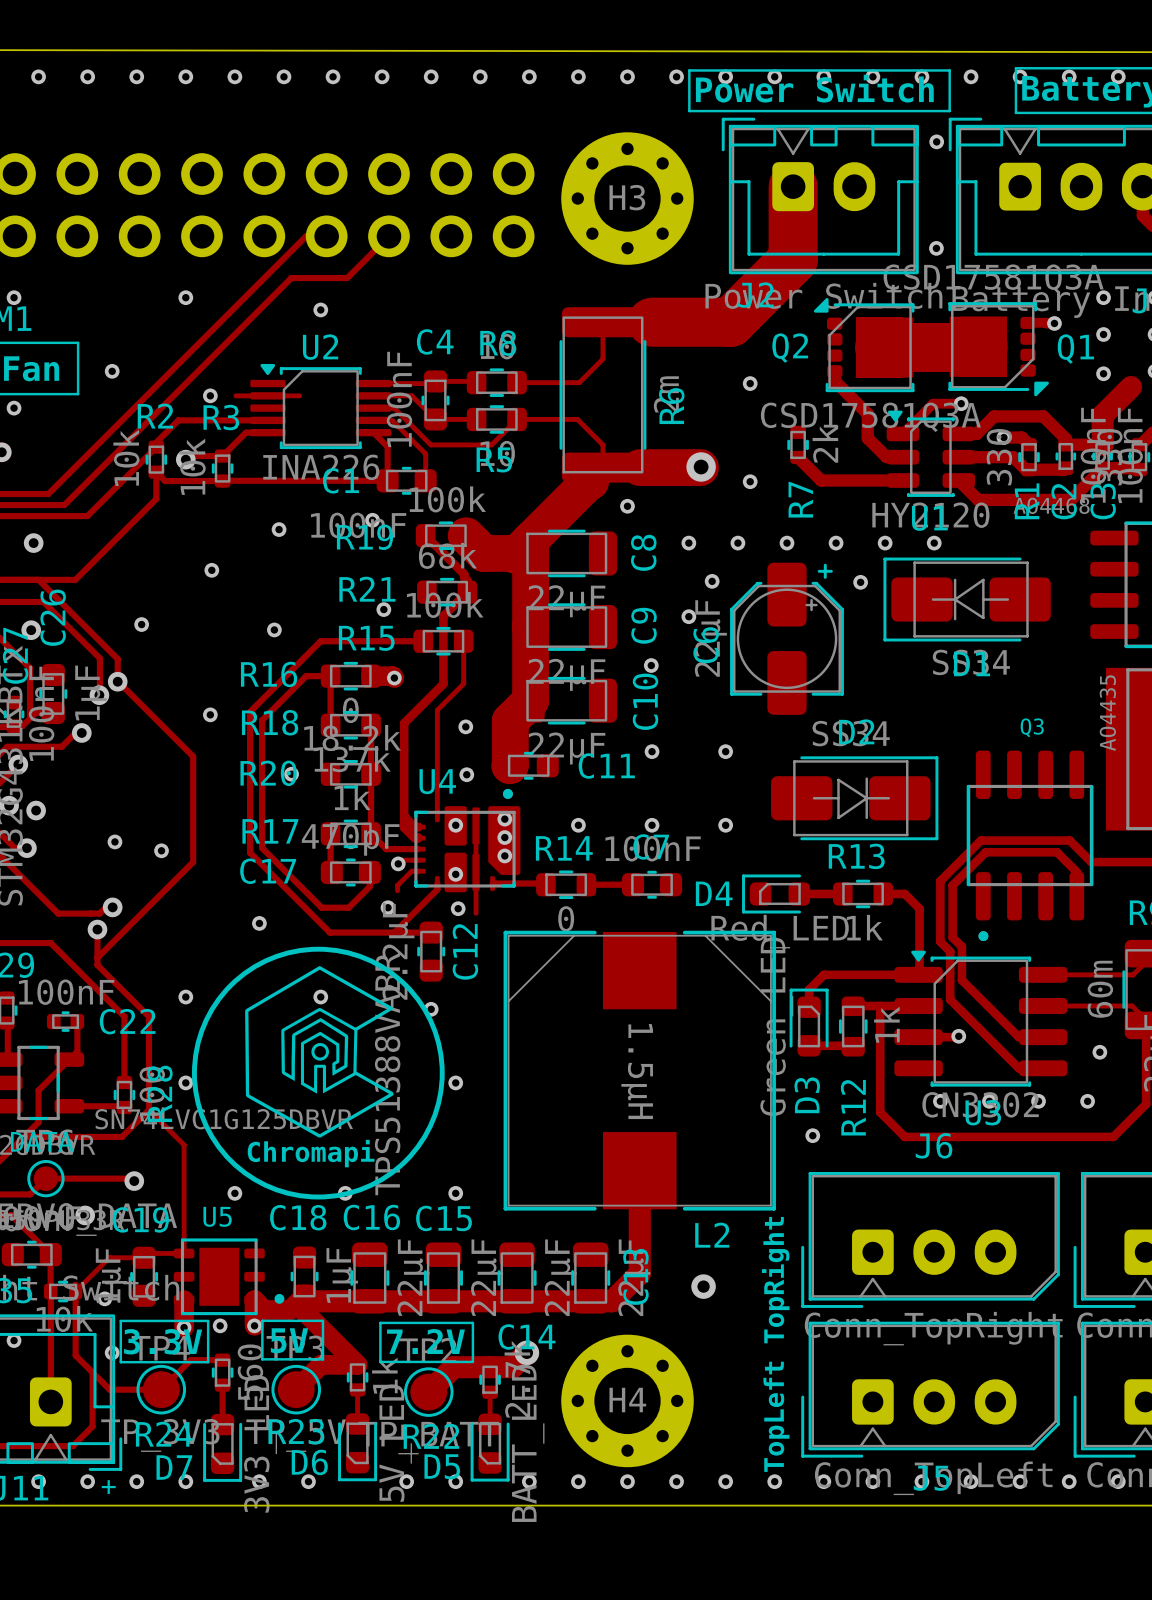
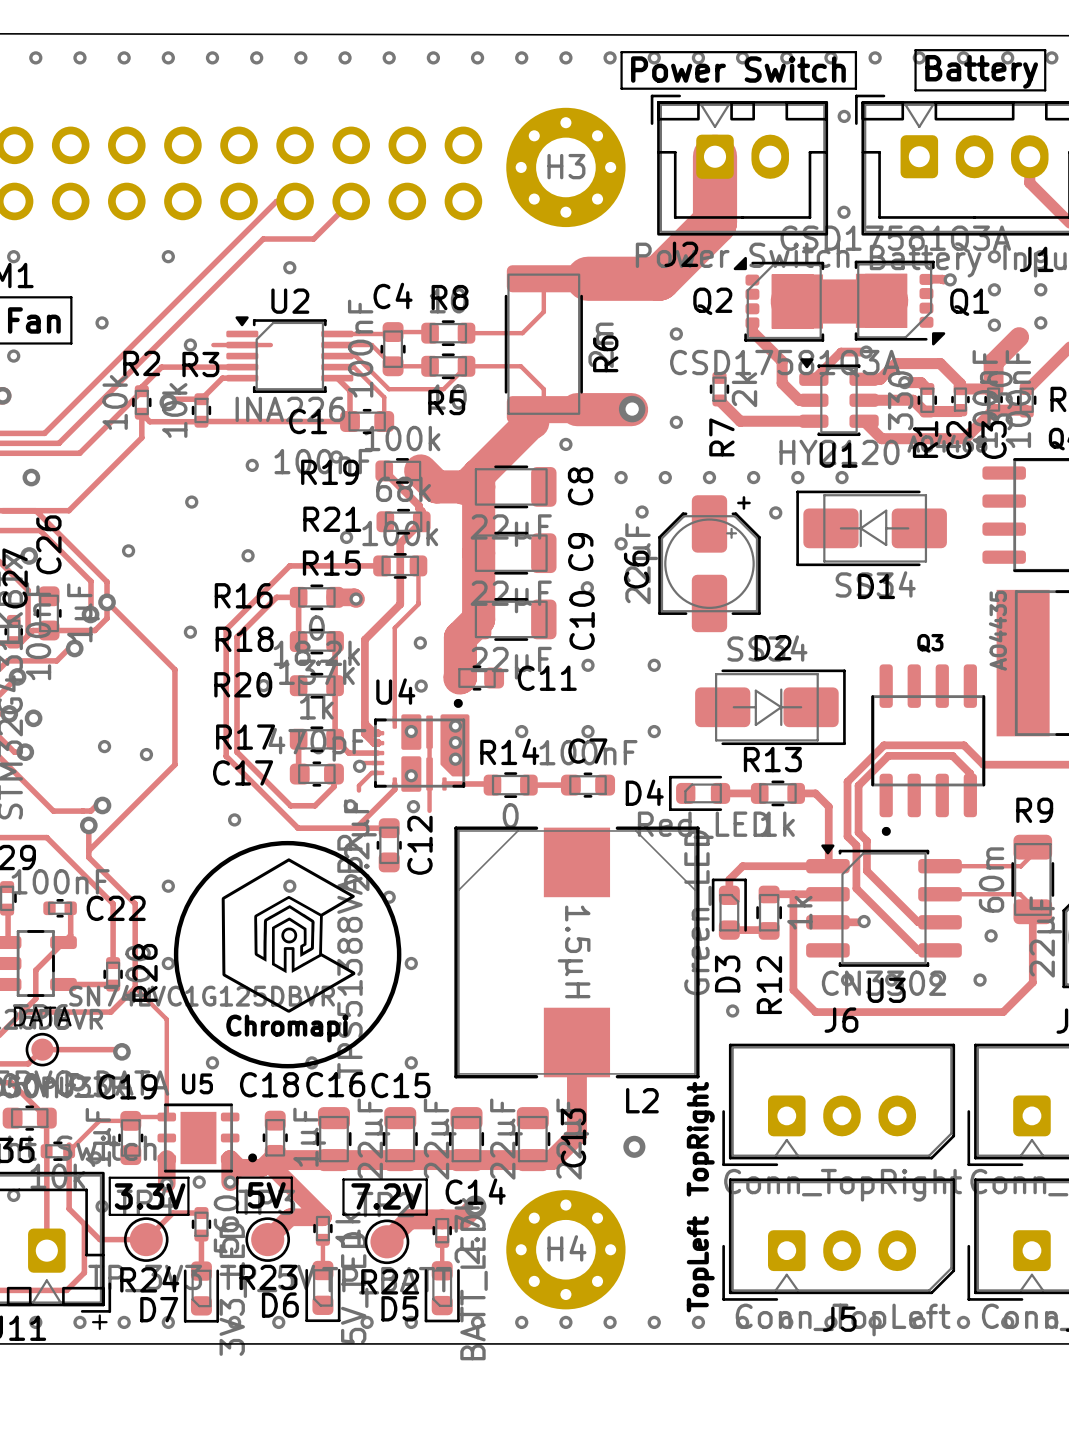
track: none -> (107, 602) (107, 618) (94, 630) (49, 630)

